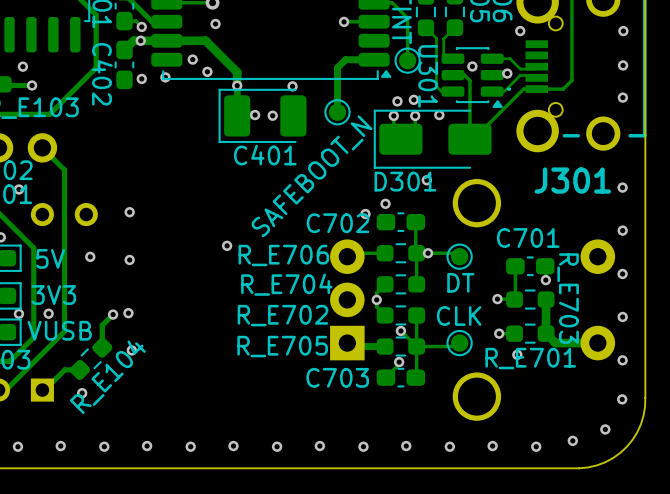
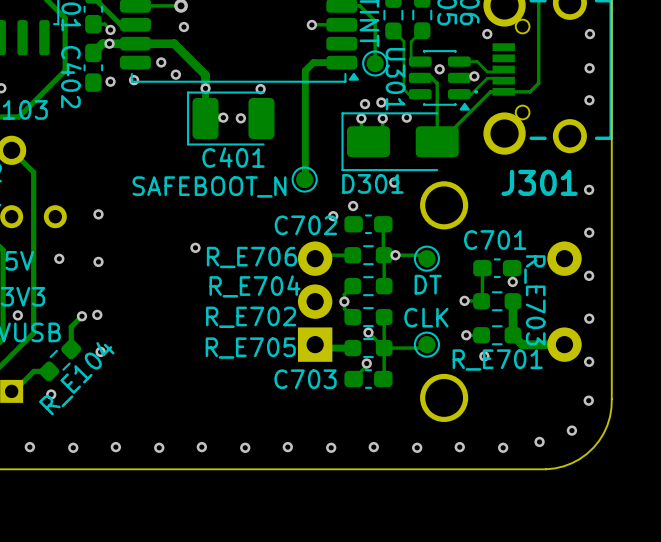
track: none -> (305, 114) (304, 179)
part position: (337, 112) -> (304, 179)
part value rotation: 0° (312, 176) -> 45° clockwise (209, 186)

